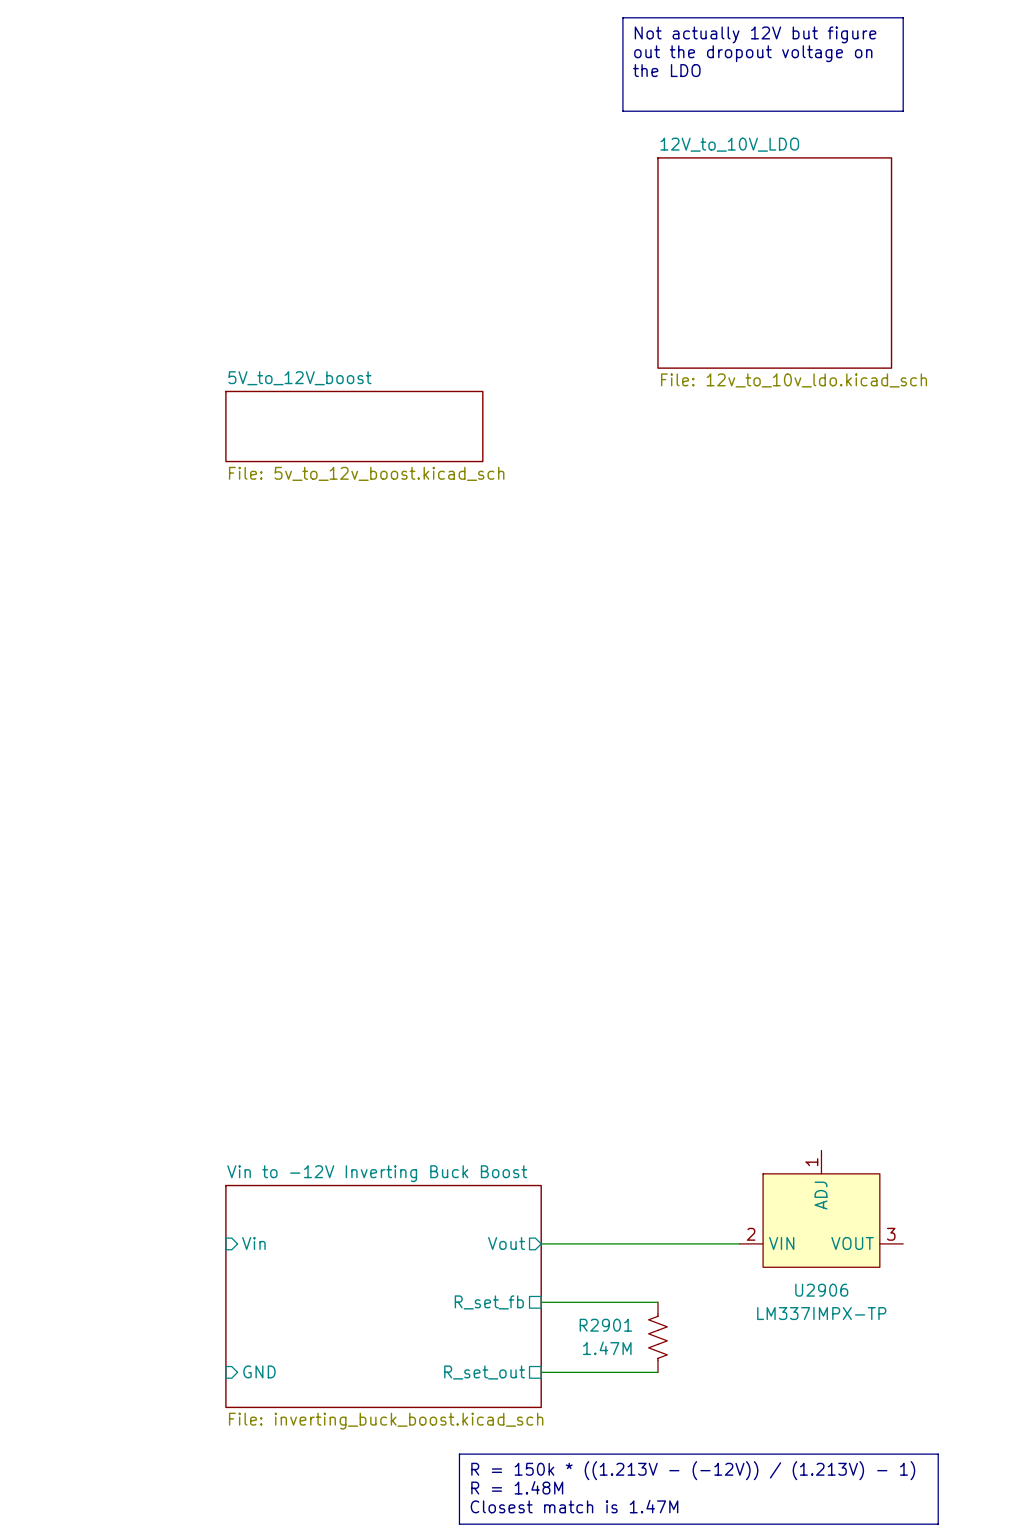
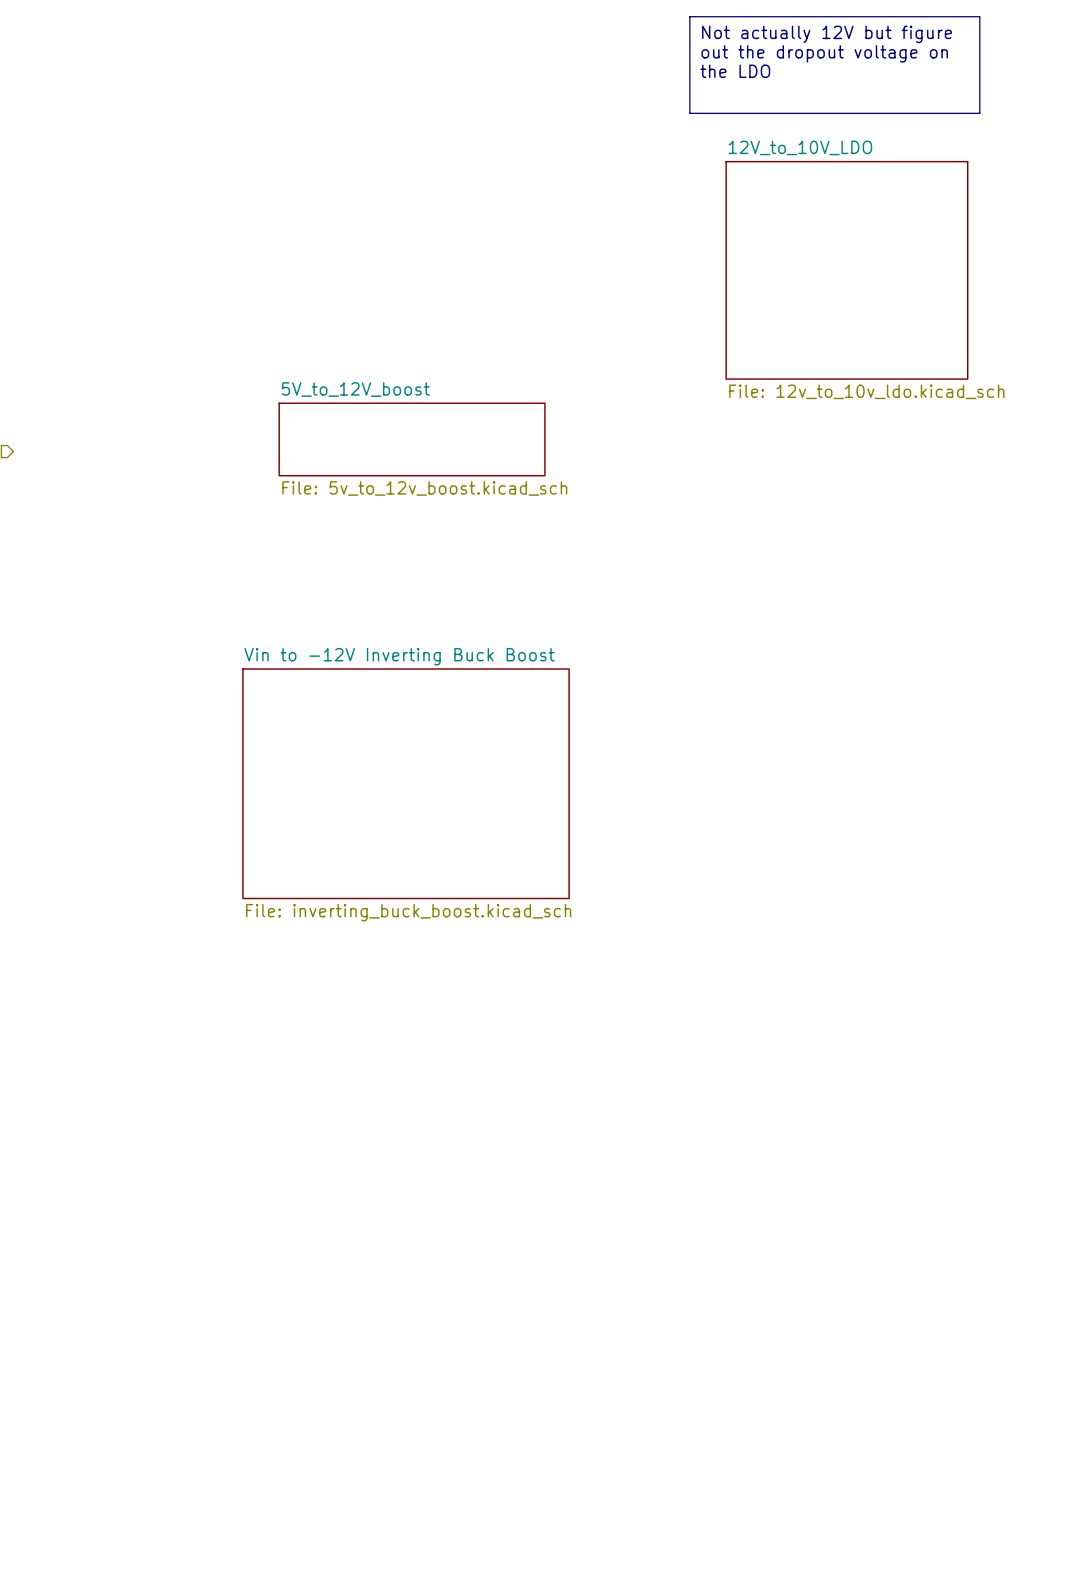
U2906: LM337IMPX-TP (821, 1208) -> none
sheet pin: Vin (253, 1243) -> none
sheet pin: Vout (506, 1243) -> none
wire: (541, 1243) (739, 1243) -> none
sheet Vin to -12V Inverting Buck Boost position: (383, 1296) -> (406, 783)
sheet pin: R_set_fb (489, 1302) -> none
wire: (541, 1302) (657, 1302) -> none
R2901: 1.47M (657, 1337) -> none
sheet pin: GND (259, 1371) -> none
sheet pin: R_set_out (484, 1372) -> none
wire: (541, 1372) (657, 1372) -> none
line: (459, 1454) (938, 1454) (938, 1524) (459, 1524) (459, 1454) -> none
text: R = 150k * ((1.213V - (-12V)) / (1.213V) - 1) (693, 1470) -> none
text: R = 1.48M (517, 1487) -> none
text: Closest match is 1.47M (574, 1506) -> none

